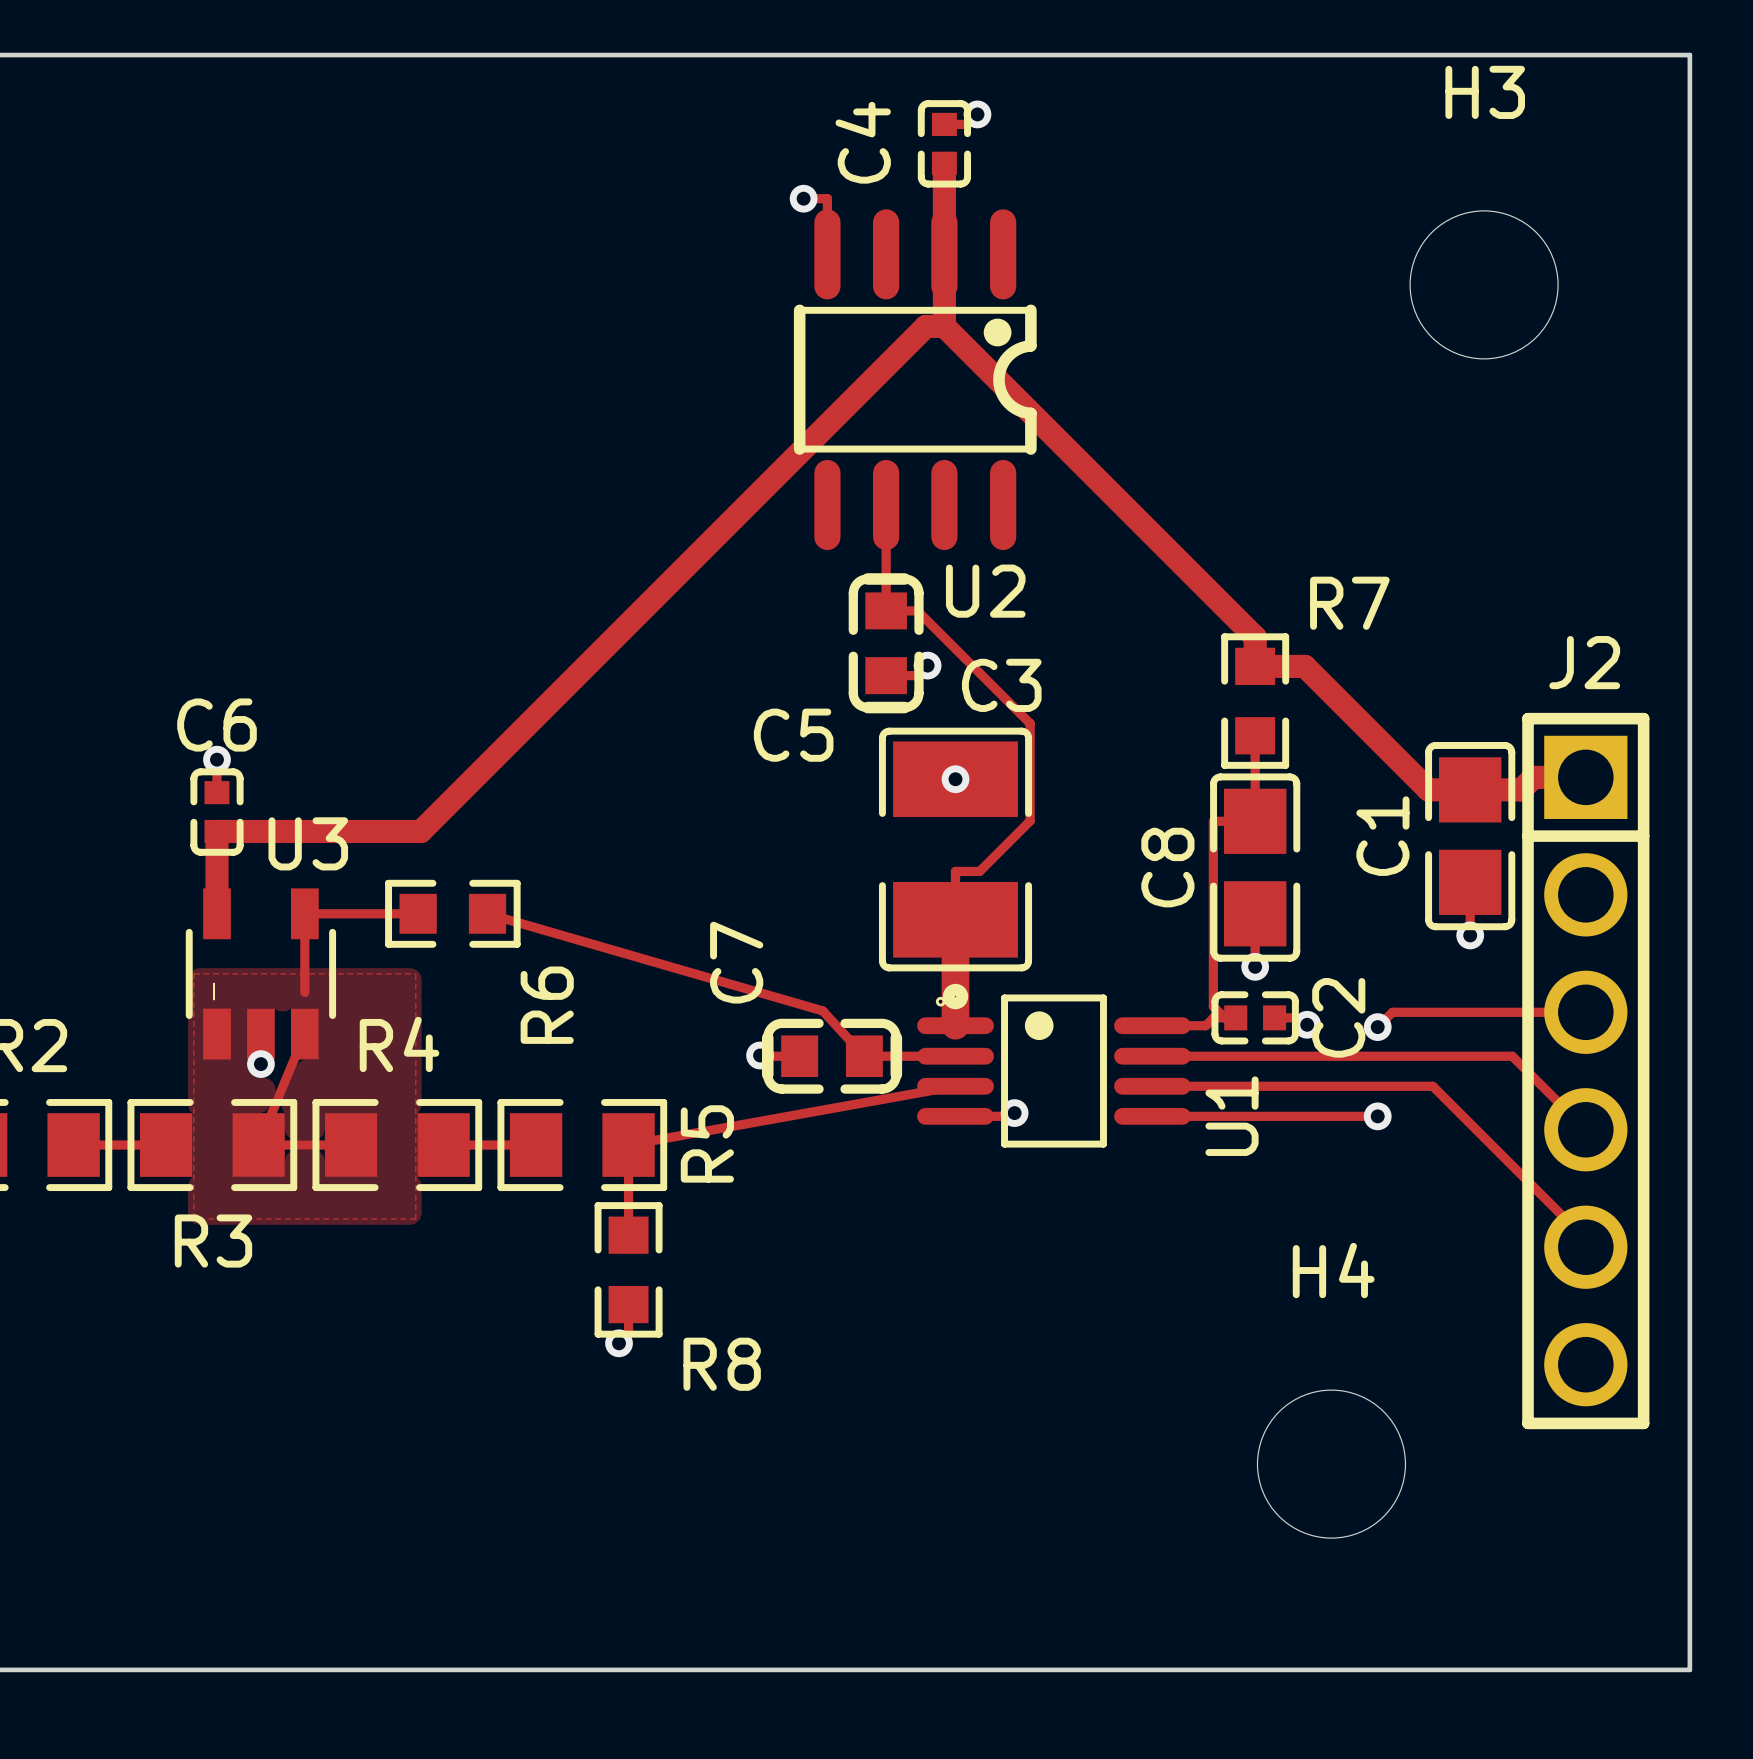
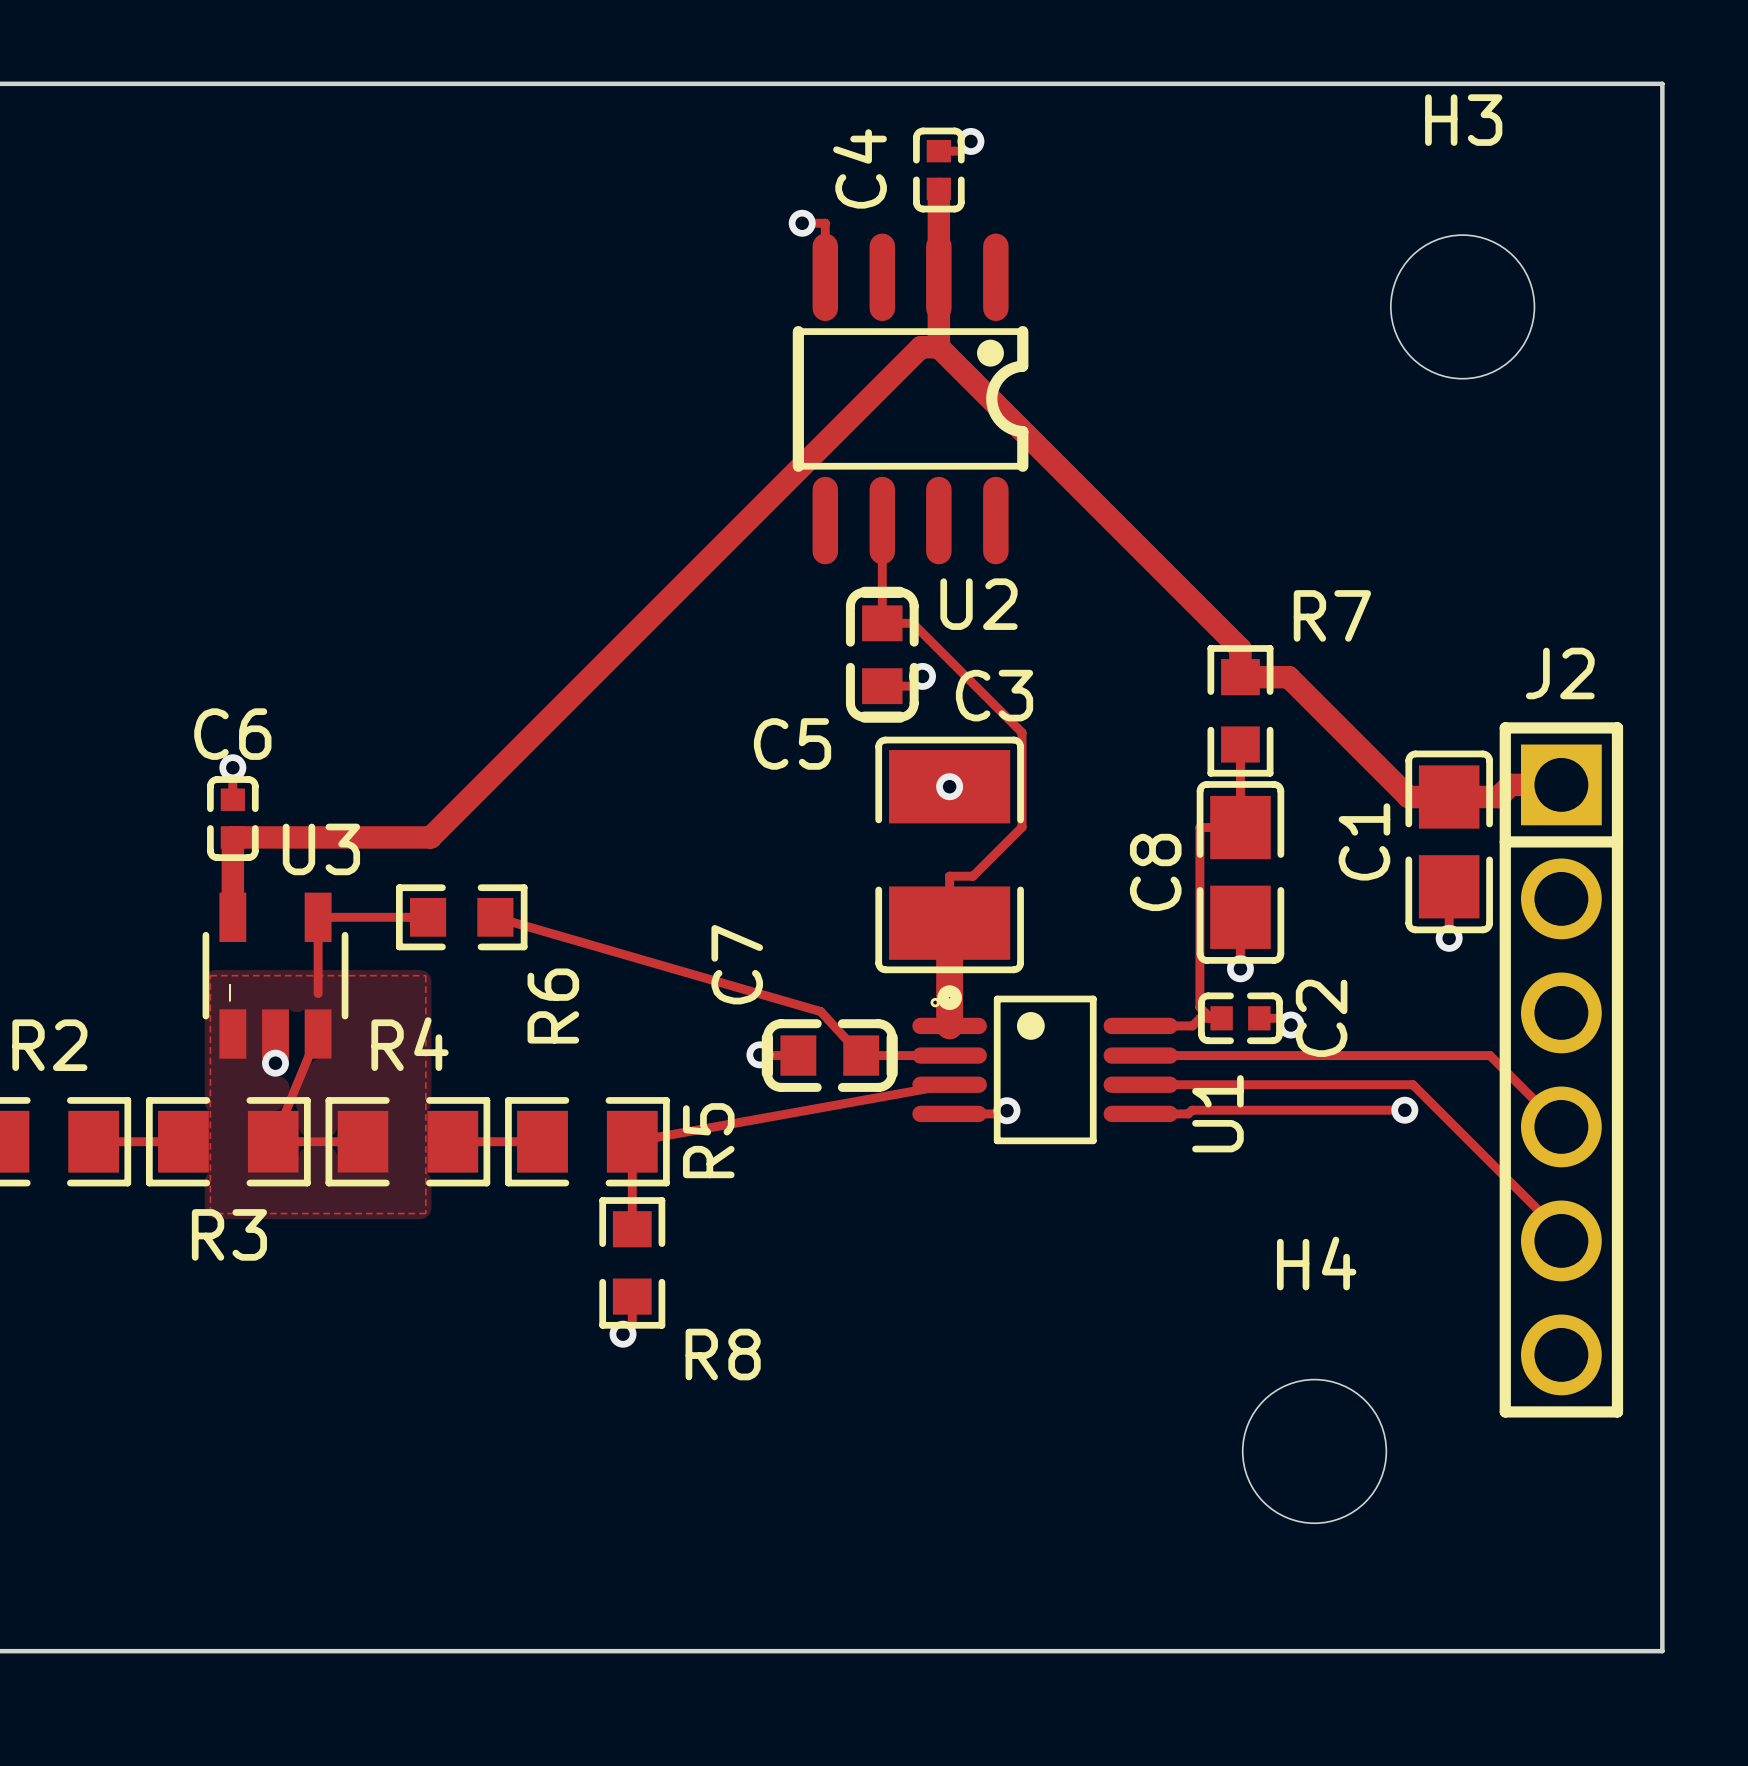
track: (1585, 1012) (1392, 1012) (1377, 1027) -> none
via: (1377, 1027) -> none
track: (1201, 1116) (1377, 1116) -> (1188, 1113) (1192, 1110) (1404, 1110)
via position: (1377, 1116) -> (1404, 1110)

